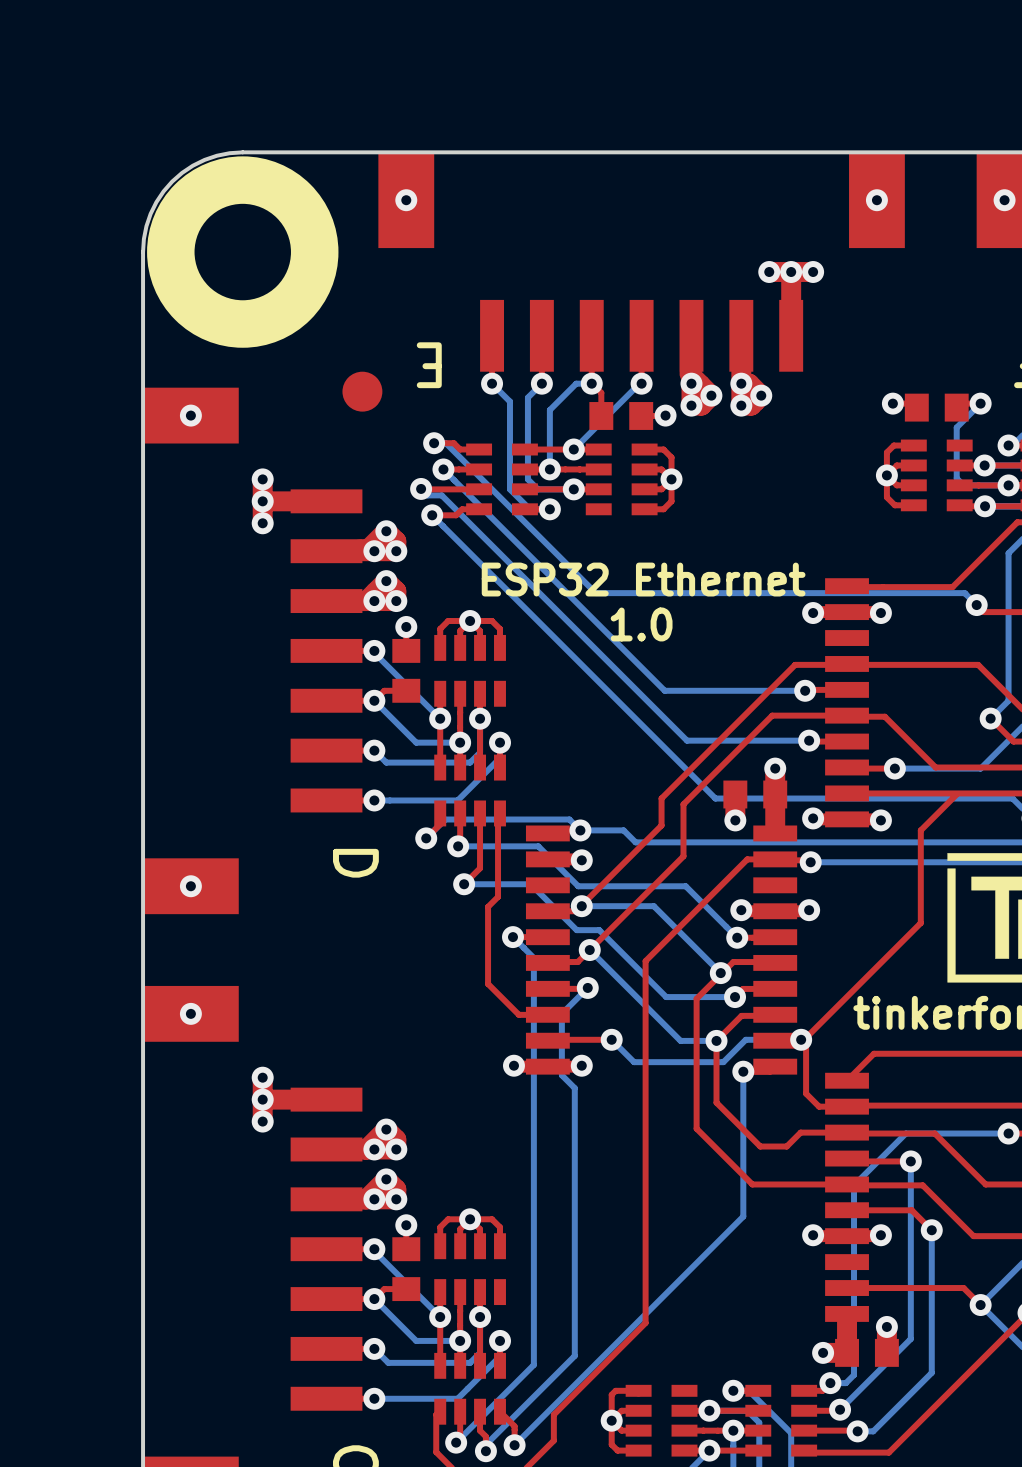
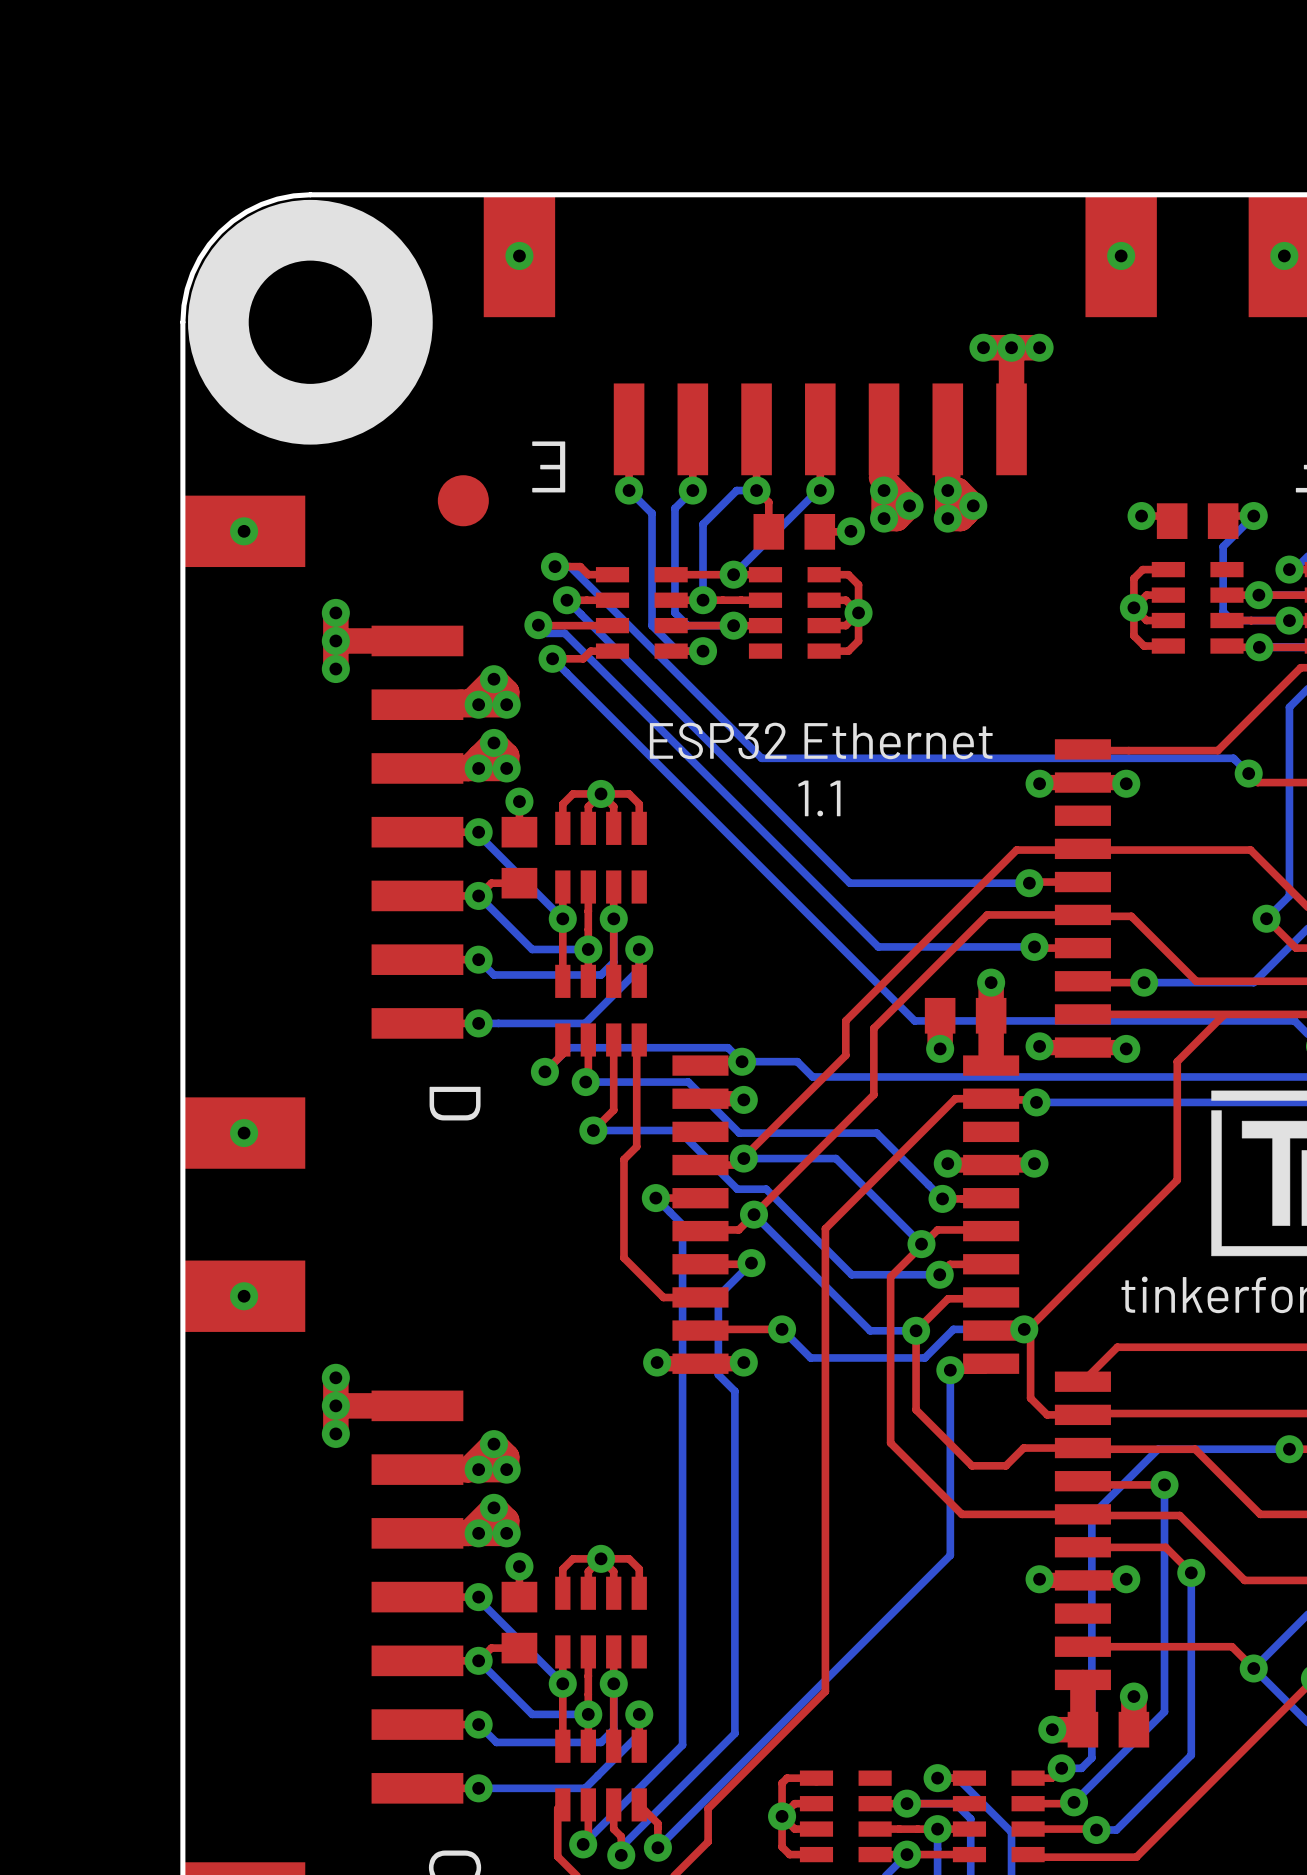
text: 1.0 (641, 624) -> 1.1 (819, 798)

